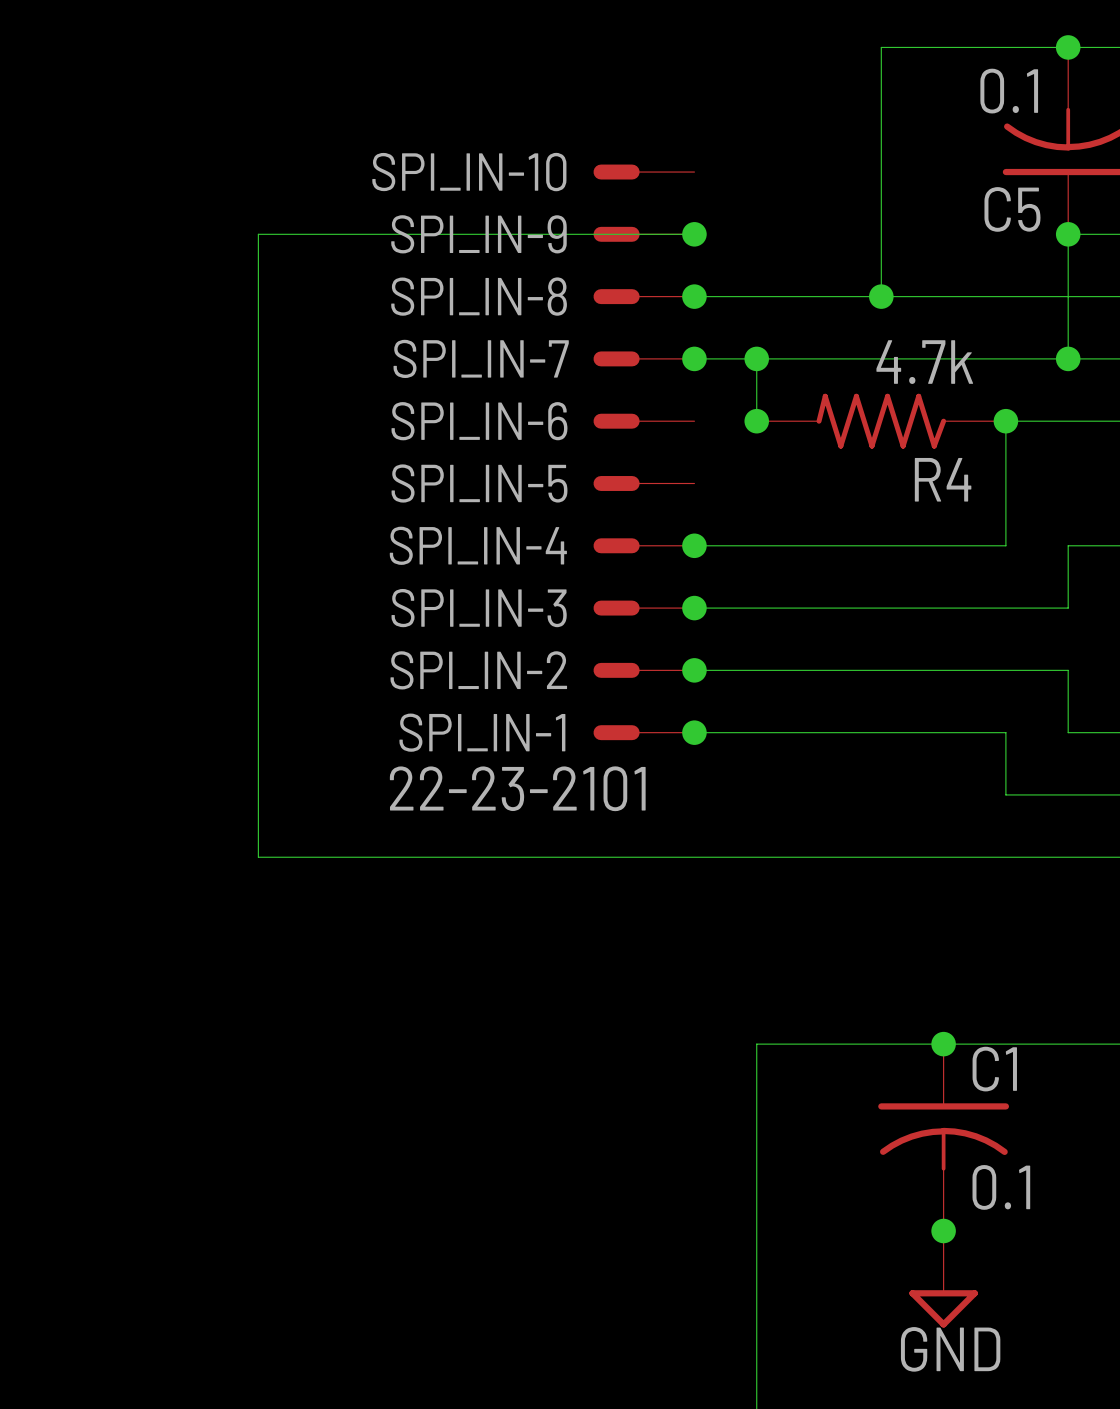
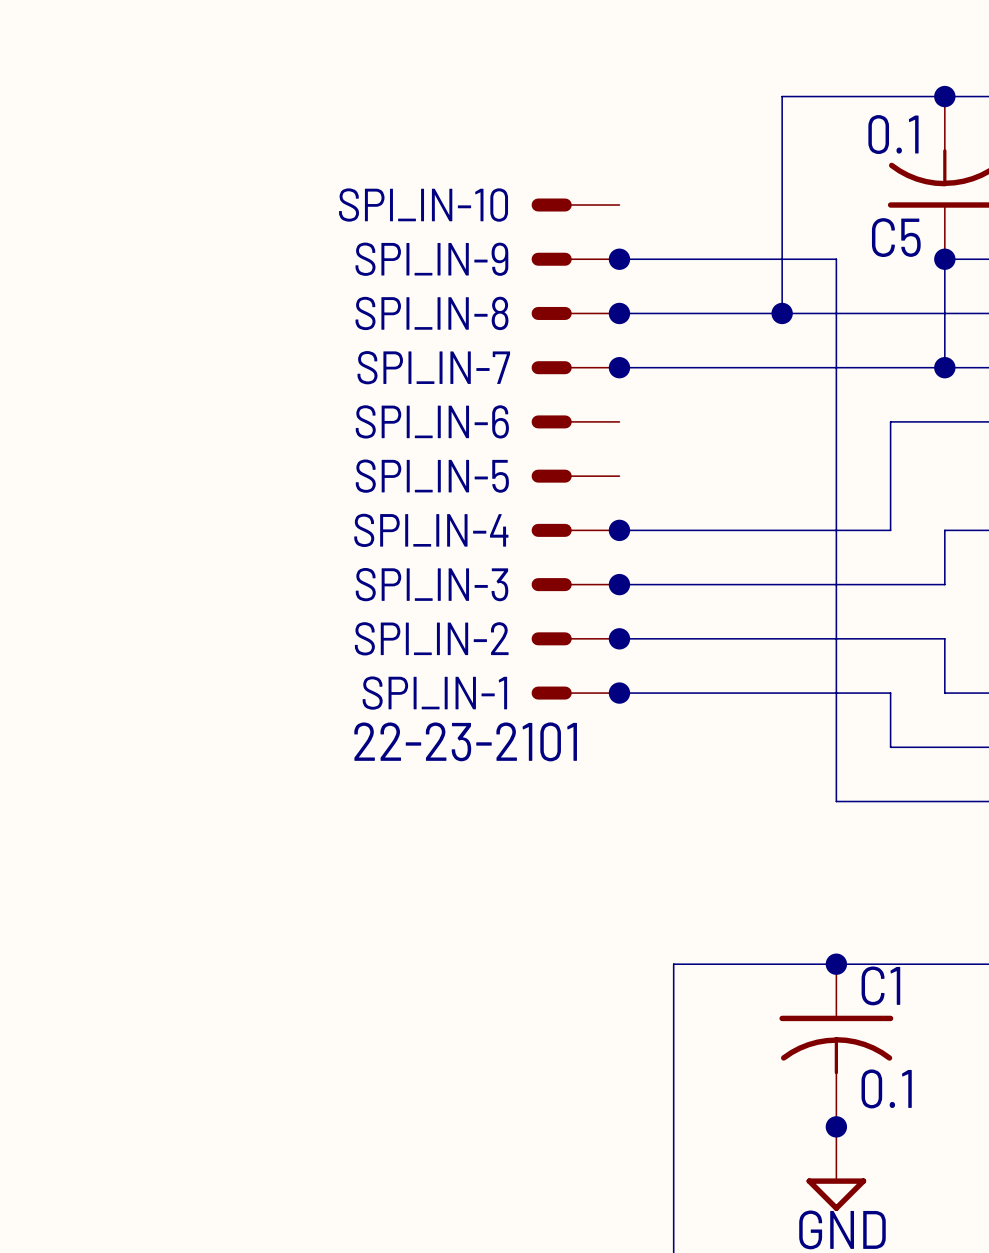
wire: (694, 234) (258, 234) (258, 857) (943, 857) -> (619, 259) (836, 259) (836, 801)
wire: (756, 358) (756, 421) -> none
junction: (756, 358) -> none
junction: (756, 421) -> none
R4: 4.7k (881, 421) -> none
junction: (1005, 421) -> none

